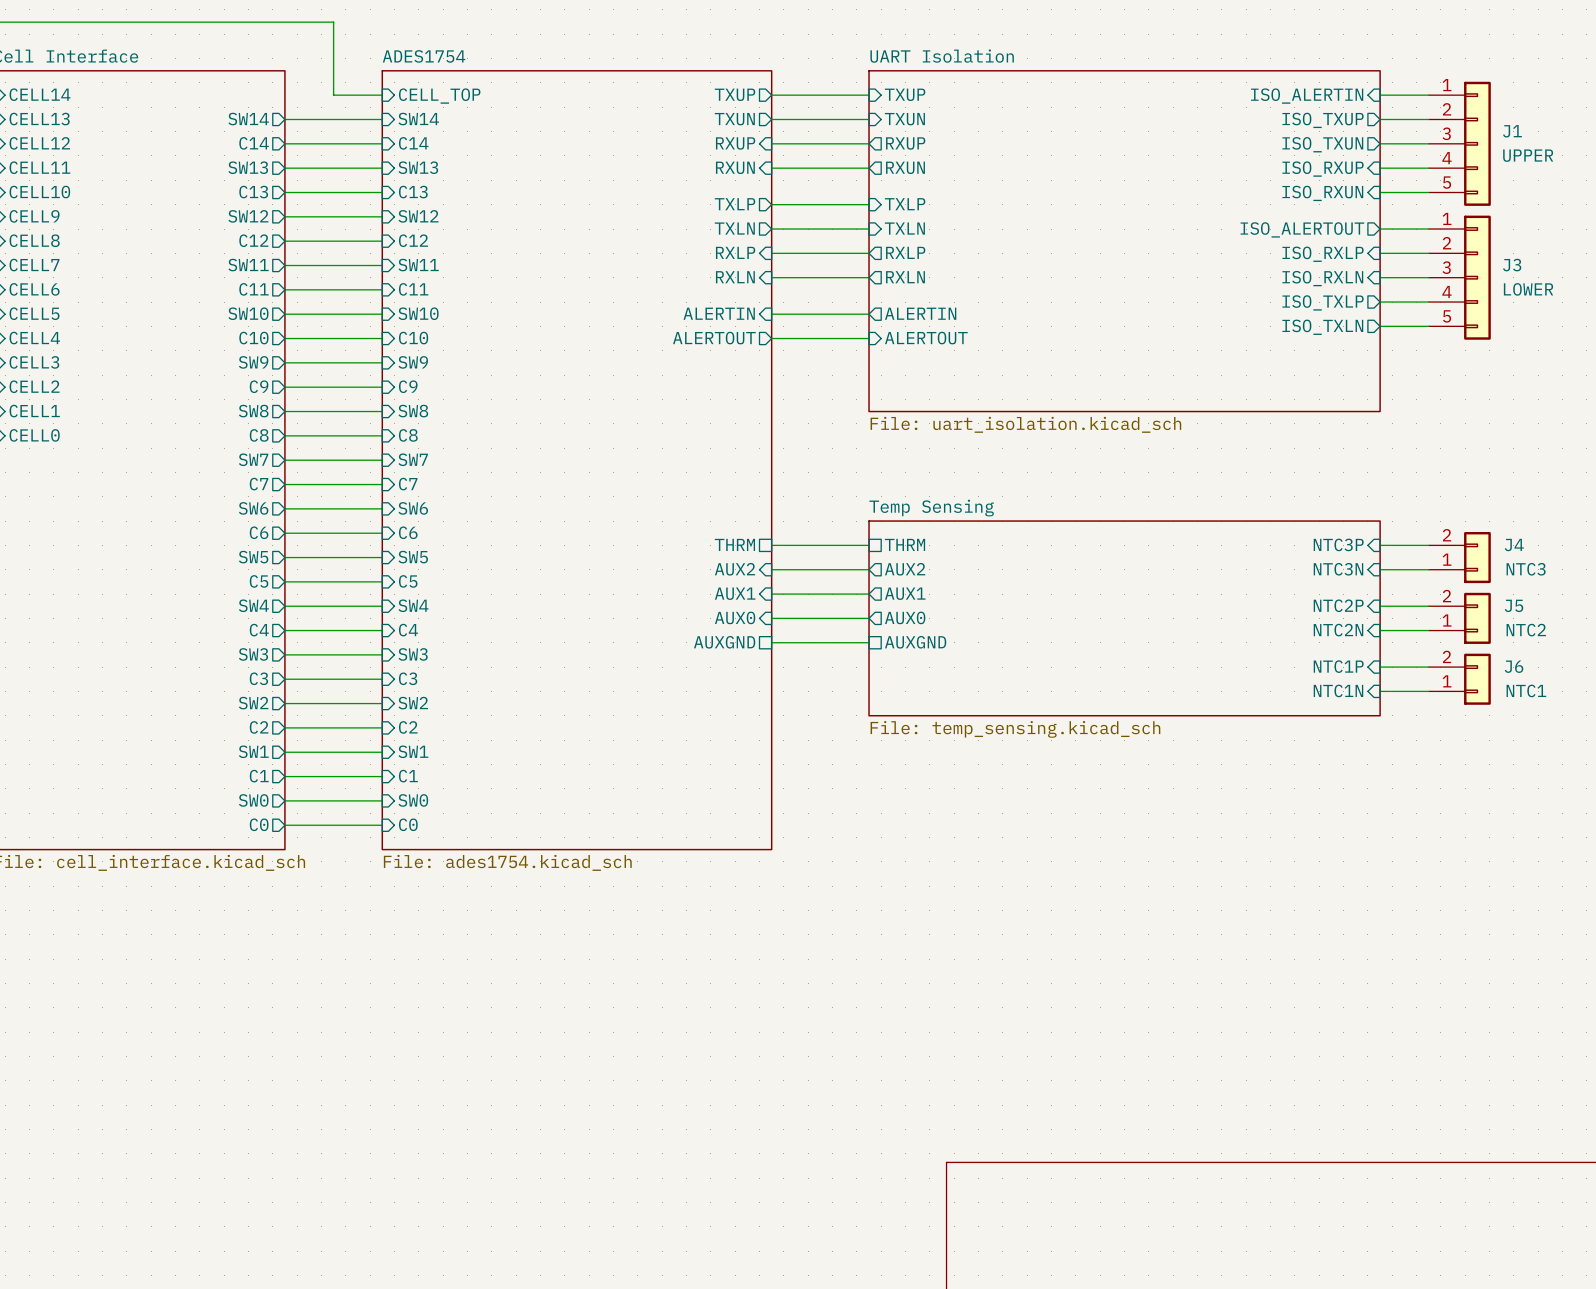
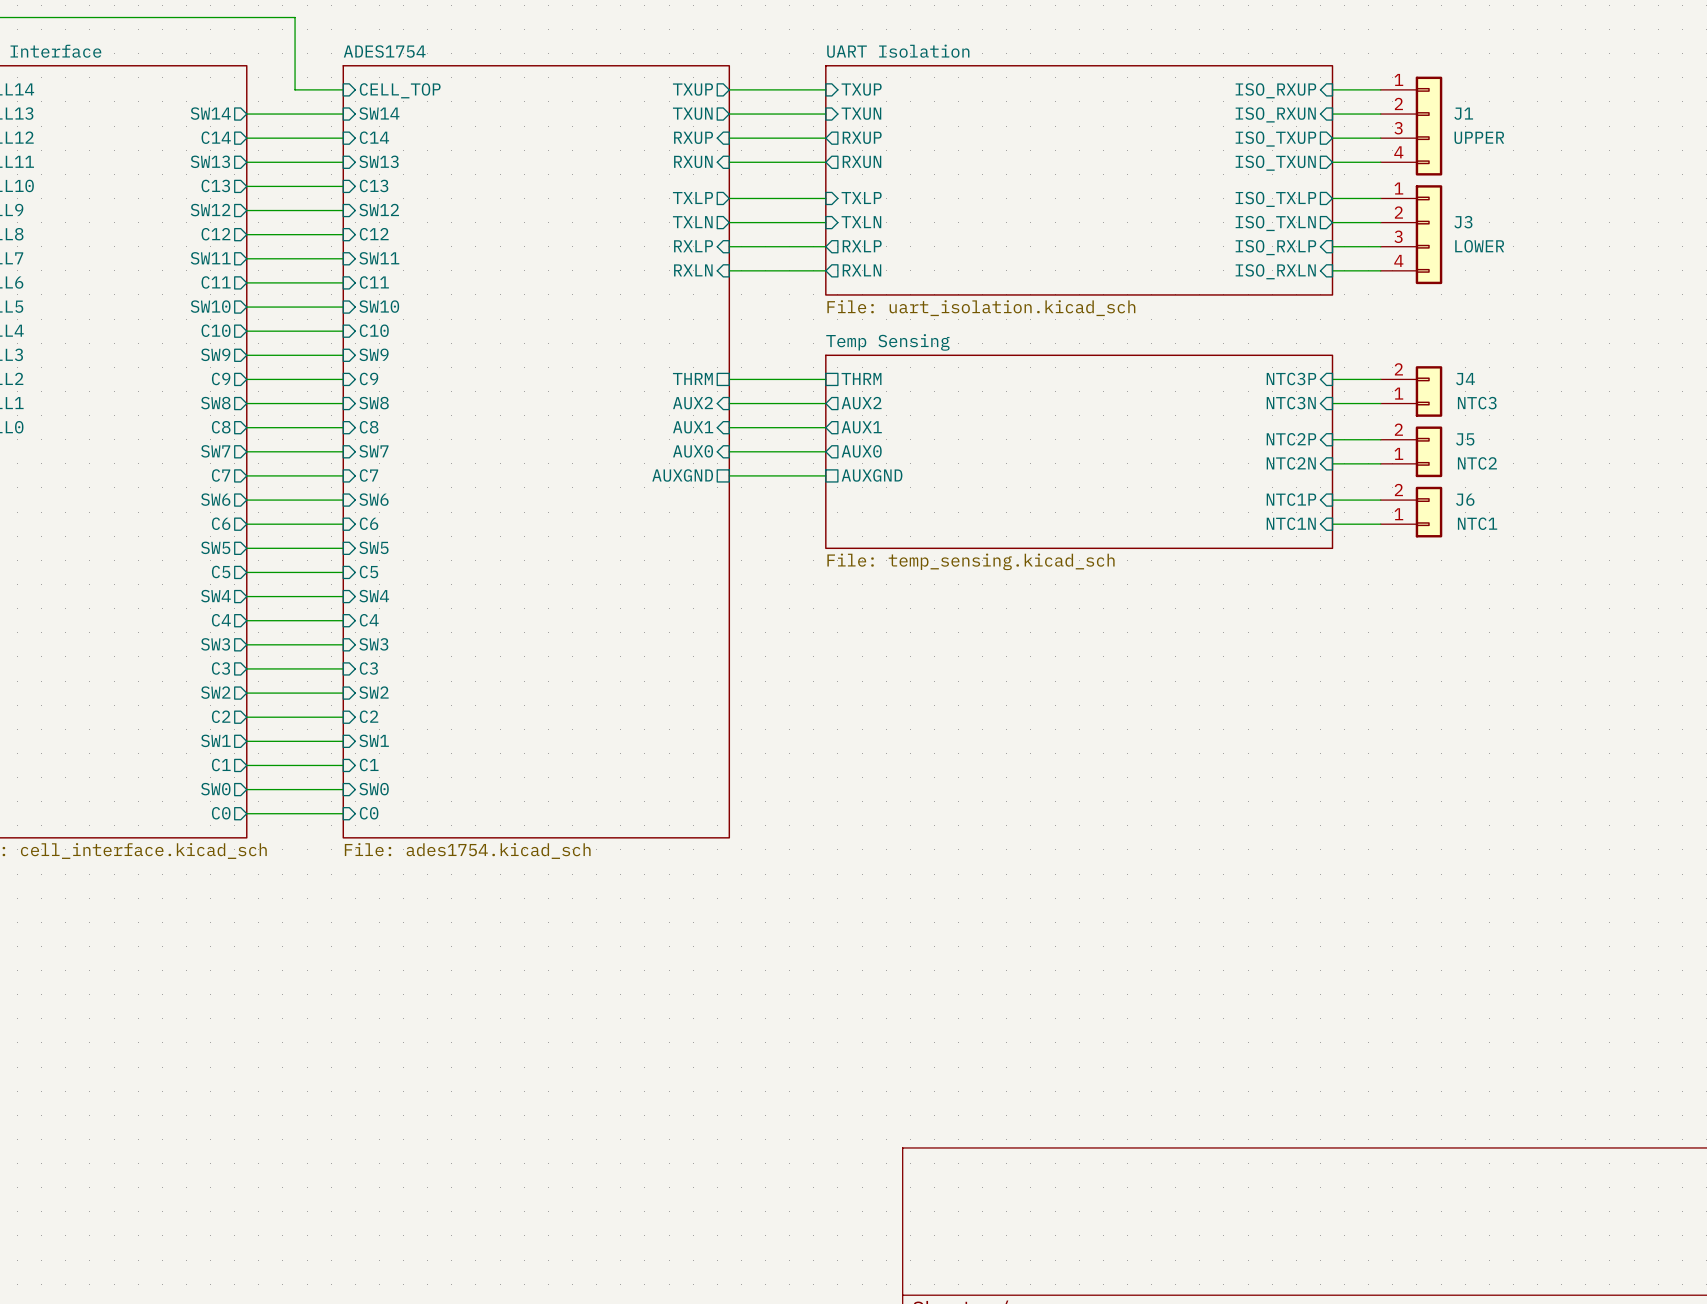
J1 symbol: [1428, 81, 1491, 206] -> [1380, 76, 1443, 176]
sheet pin: ISO_ALERTIN (1307, 96) -> ISO_RXUP (1275, 90)
sheet pin shape: output (1323, 120) -> input (1275, 114)
sheet pin: ISO_TXUP (1323, 120) -> ISO_RXUN (1275, 114)
sheet pin: ISO_TXUN (1322, 144) -> ISO_TXUP (1275, 139)
sheet pin shape: input (1323, 169) -> output (1275, 163)
sheet pin: ISO_RXUP (1323, 169) -> ISO_TXUN (1275, 163)
sheet UART Isolation: none -> File: uart_isolation.kicad_sch (1079, 180)
wire: (1380, 192) (1428, 192) -> none
sheet pin: ISO_RXUN (1322, 193) -> none
J3 symbol: [1428, 215, 1491, 340] -> [1380, 185, 1443, 285]
sheet pin: ISO_ALERTOUT (1302, 229) -> ISO_TXLN (1275, 223)
sheet UART Isolation: File: uart_isolation.kicad_sch (1124, 241) -> none
sheet pin position: ISO_TXLP (1323, 302) -> ISO_TXLP (1275, 199)
wire: (1380, 302) (1428, 302) -> (1332, 198) (1380, 198)
sheet pin: ALERTIN (719, 313) -> none
sheet pin: ALERTIN (920, 313) -> none
wire: (771, 314) (869, 314) -> none
wire: (1380, 326) (1428, 326) -> none
sheet pin: ISO_TXLN (1322, 327) -> none
sheet pin: ALERTOUT (714, 338) -> none
wire: (771, 338) (869, 338) -> none
sheet pin: ALERTOUT (926, 338) -> none
sheet pin: none -> THRM (692, 378)
sheet pin: none -> THRM (861, 378)
sheet pin: none -> AUX2 (692, 403)
sheet pin: none -> AUX2 (861, 403)
sheet pin: none -> AUX1 (693, 427)
sheet pin: none -> AUX1 (861, 427)
sheet pin: none -> AUX0 (693, 451)
sheet pin: none -> AUX0 (861, 451)
sheet pin: none -> AUXGND (682, 475)
sheet pin: none -> AUXGND (872, 475)
sheet pin: THRM (734, 544) -> none
sheet pin: THRM (905, 544) -> none
sheet pin position: NTC3P (1338, 544) -> NTC3P (1291, 378)
wire: (771, 545) (869, 545) -> (729, 379) (825, 379)
wire: (1380, 545) (1428, 545) -> (1332, 379) (1380, 379)
J4 position: (1459, 557) -> (1411, 391)
sheet pin: AUX2 (735, 569) -> none
wire: (771, 569) (869, 569) -> (729, 403) (825, 403)
sheet pin: AUX2 (905, 569) -> none
sheet pin position: NTC3N (1338, 569) -> NTC3N (1291, 403)
wire: (1380, 569) (1428, 569) -> (1332, 403) (1380, 403)
sheet pin: AUX1 (735, 593) -> none
sheet pin: AUX1 (905, 593) -> none
wire: (771, 594) (869, 594) -> (729, 427) (825, 427)
sheet pin position: NTC2P (1338, 605) -> NTC2P (1291, 439)
wire: (1380, 606) (1428, 606) -> (1332, 439) (1380, 439)
sheet pin: AUX0 (735, 617) -> none
sheet pin: AUX0 (905, 617) -> none
wire: (771, 618) (869, 618) -> (729, 451) (825, 451)
sheet Temp Sensing position: (1124, 618) -> (1079, 451)
J5 position: (1459, 618) -> (1411, 451)
sheet pin position: NTC2N (1338, 630) -> NTC2N (1291, 463)
wire: (1380, 630) (1428, 630) -> (1332, 463) (1380, 463)
sheet pin: AUXGND (724, 642) -> none
wire: (771, 642) (869, 642) -> (729, 475) (825, 475)
sheet pin: AUXGND (915, 642) -> none
sheet pin position: NTC1P (1338, 666) -> NTC1P (1291, 499)
wire: (1380, 667) (1428, 667) -> (1332, 500) (1380, 500)
J6 position: (1459, 679) -> (1411, 512)
sheet pin position: NTC1N (1338, 690) -> NTC1N (1291, 523)
wire: (1380, 691) (1428, 691) -> (1332, 524) (1380, 524)

